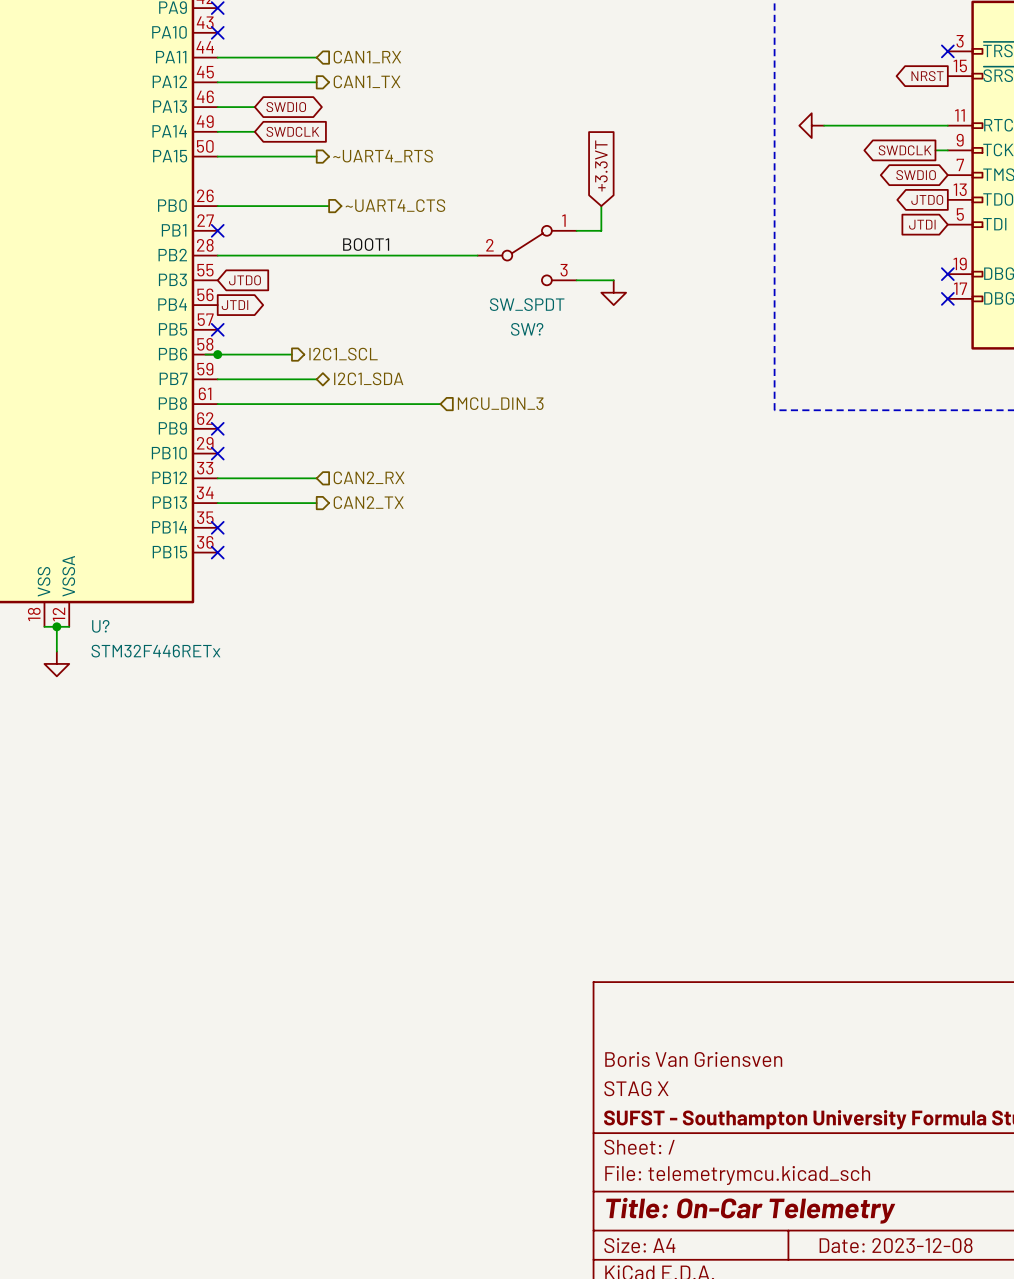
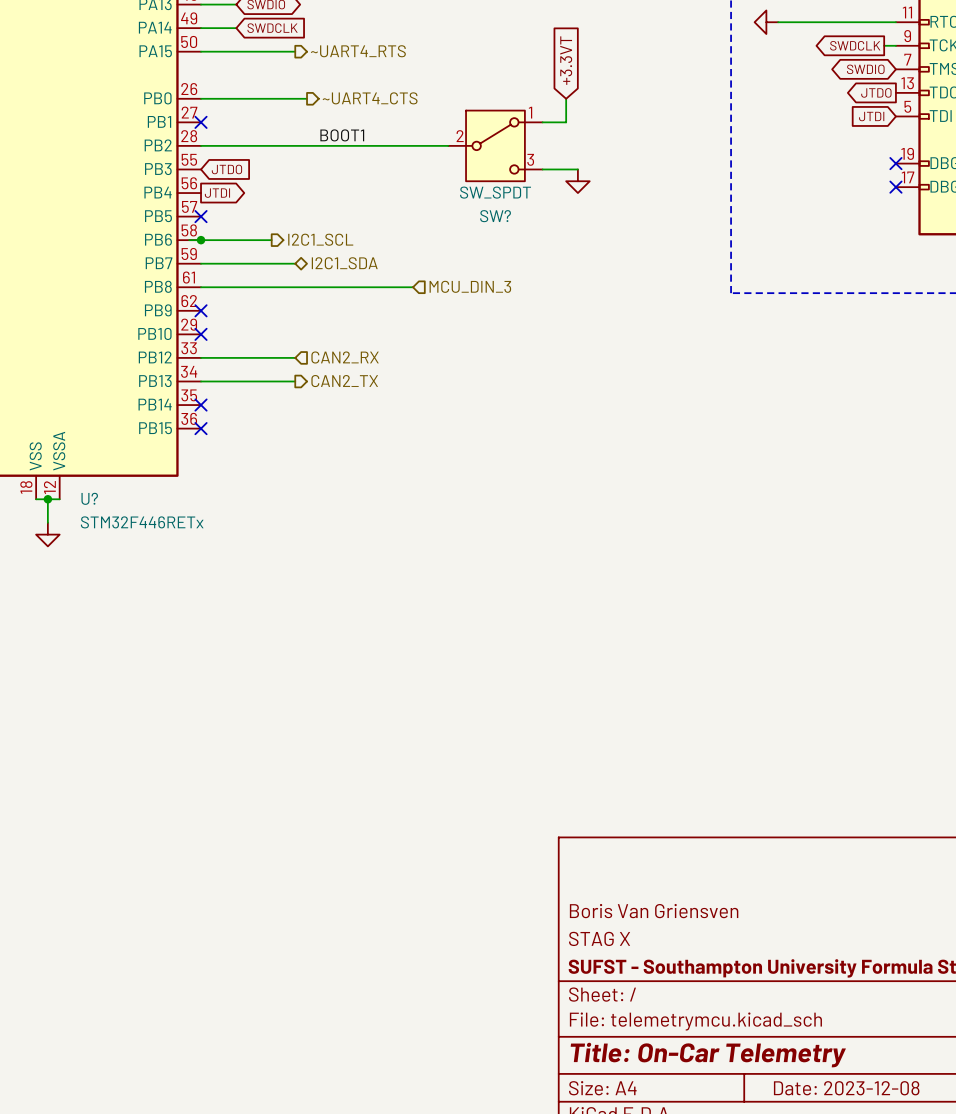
SW? symbol: [477, 225, 577, 286] -> [448, 110, 543, 182]

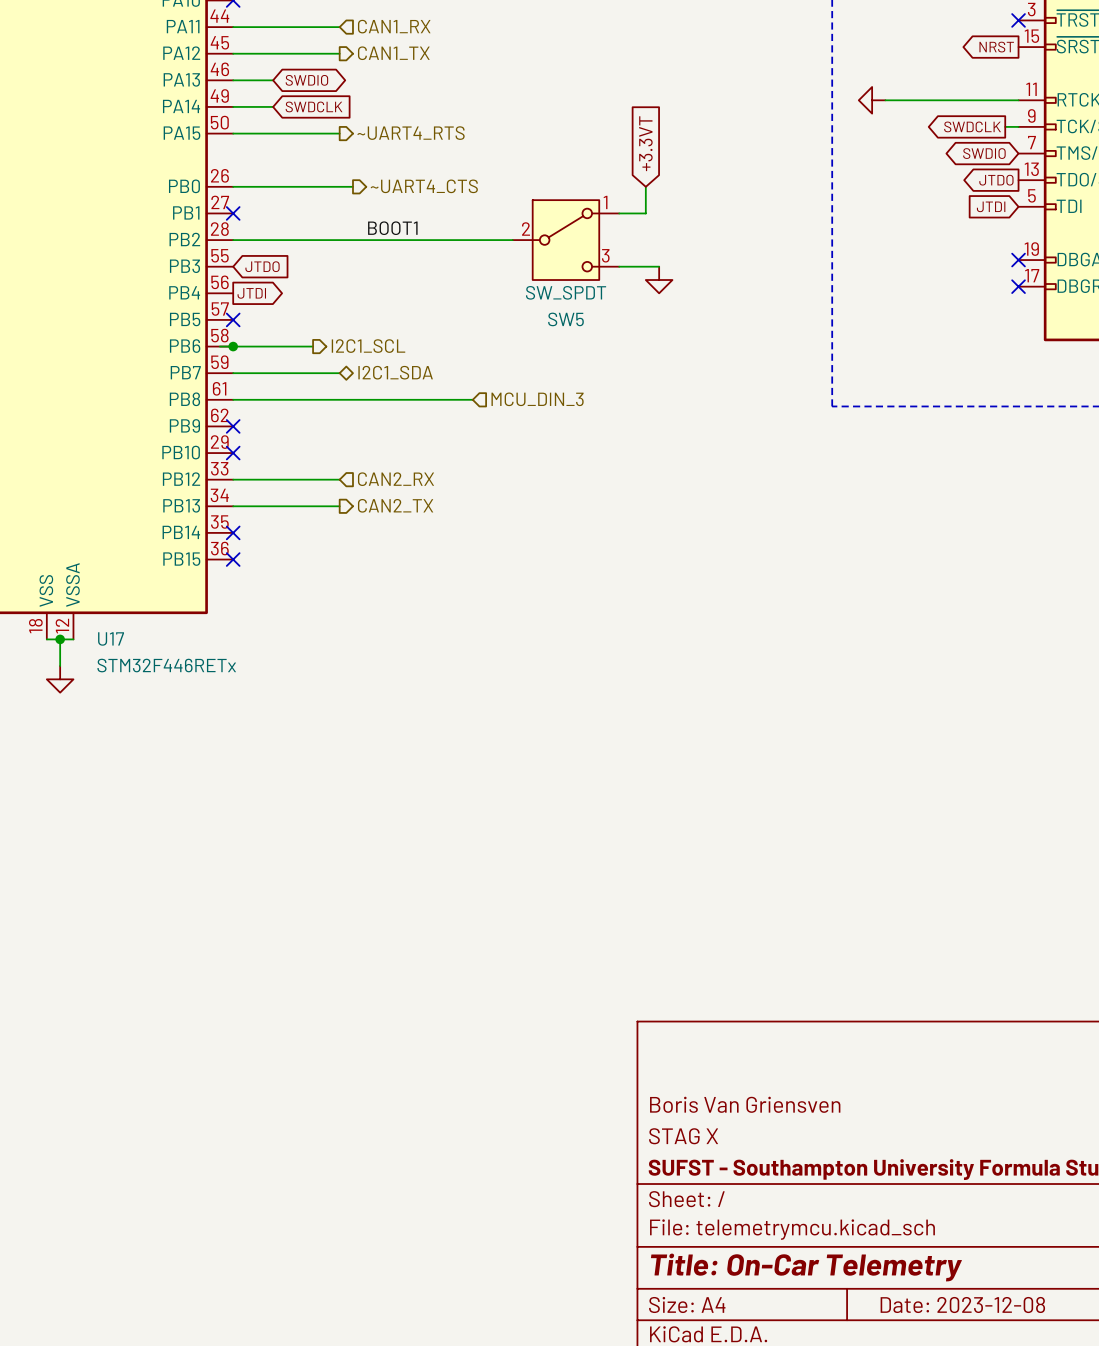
SW? name: SW? (495, 216) -> SW5 (565, 319)
U? name: U? (89, 498) -> U17 (111, 638)

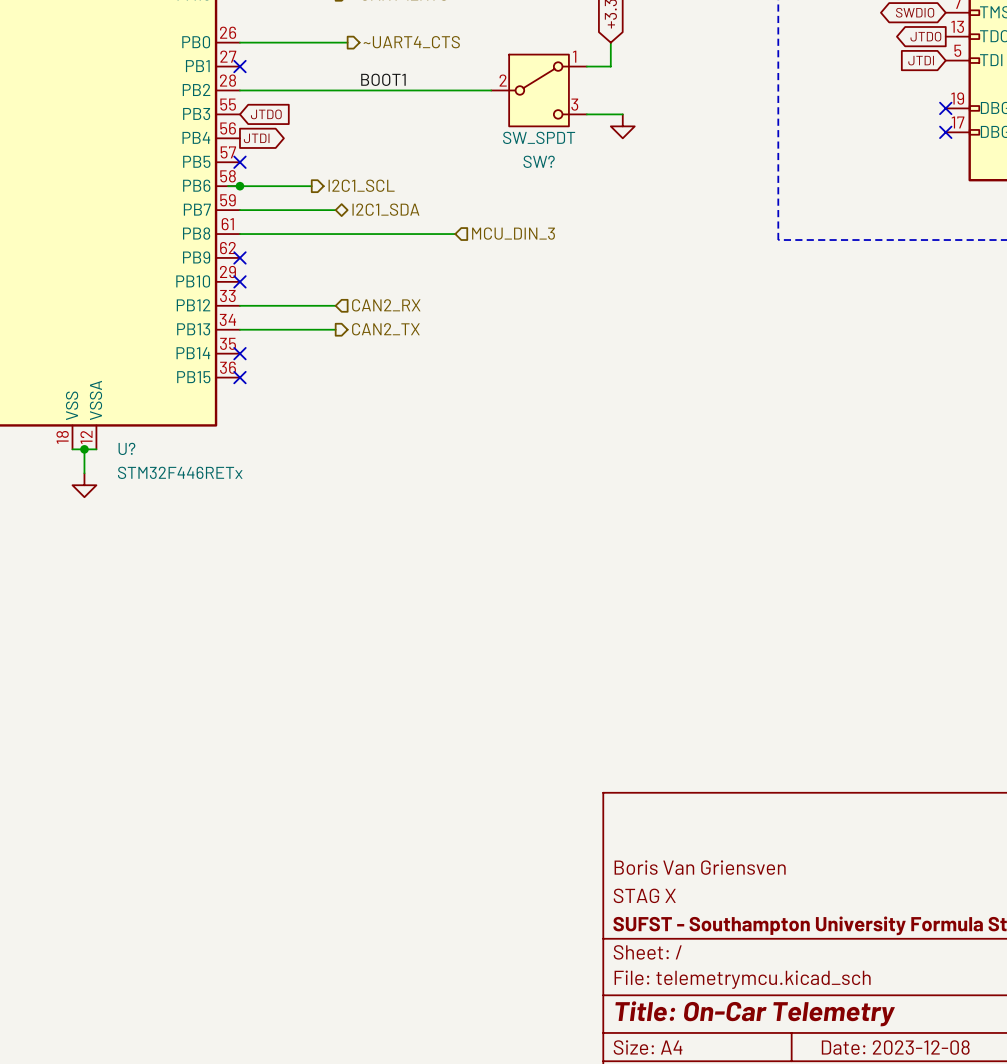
SW5 name: SW5 (565, 319) -> SW? (539, 161)
U17 name: U17 (111, 638) -> U? (126, 448)

